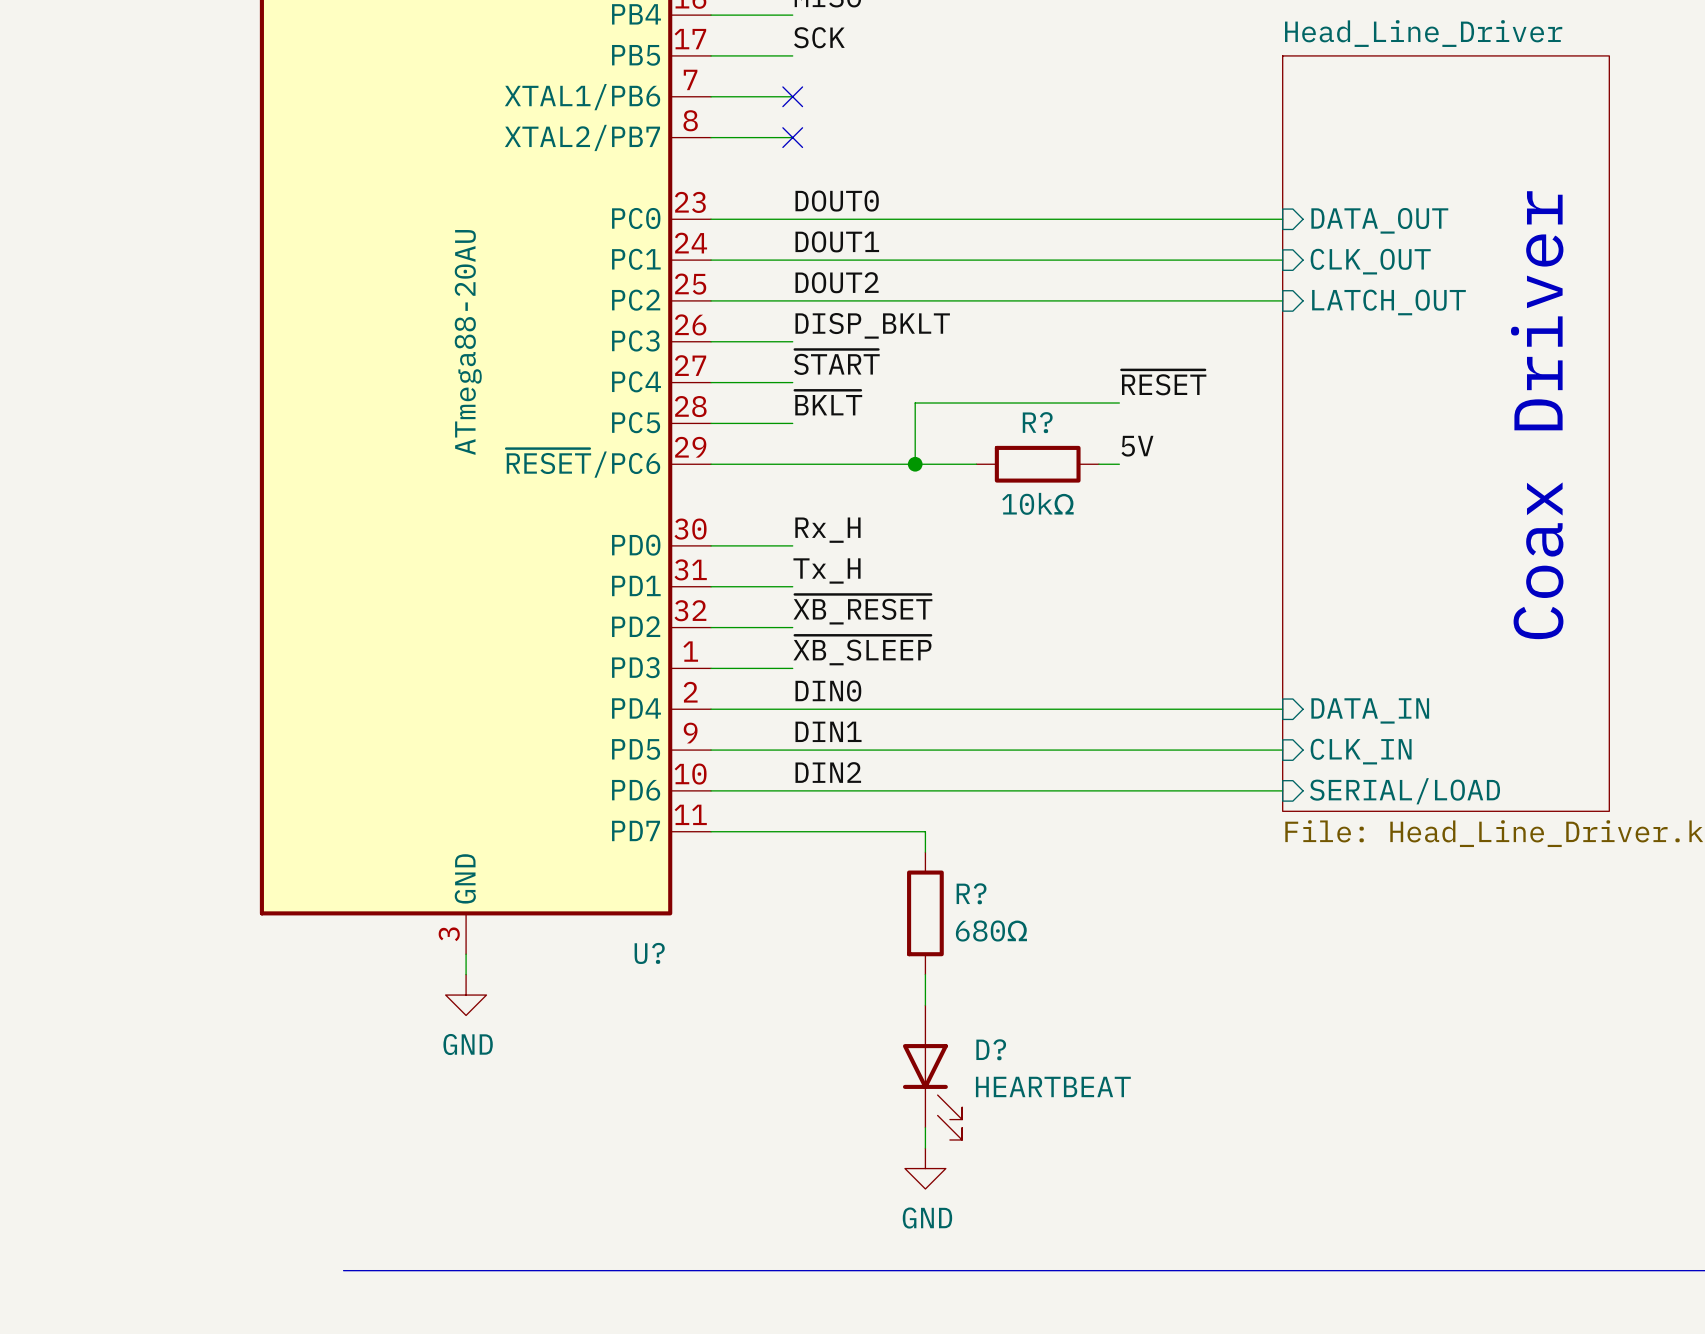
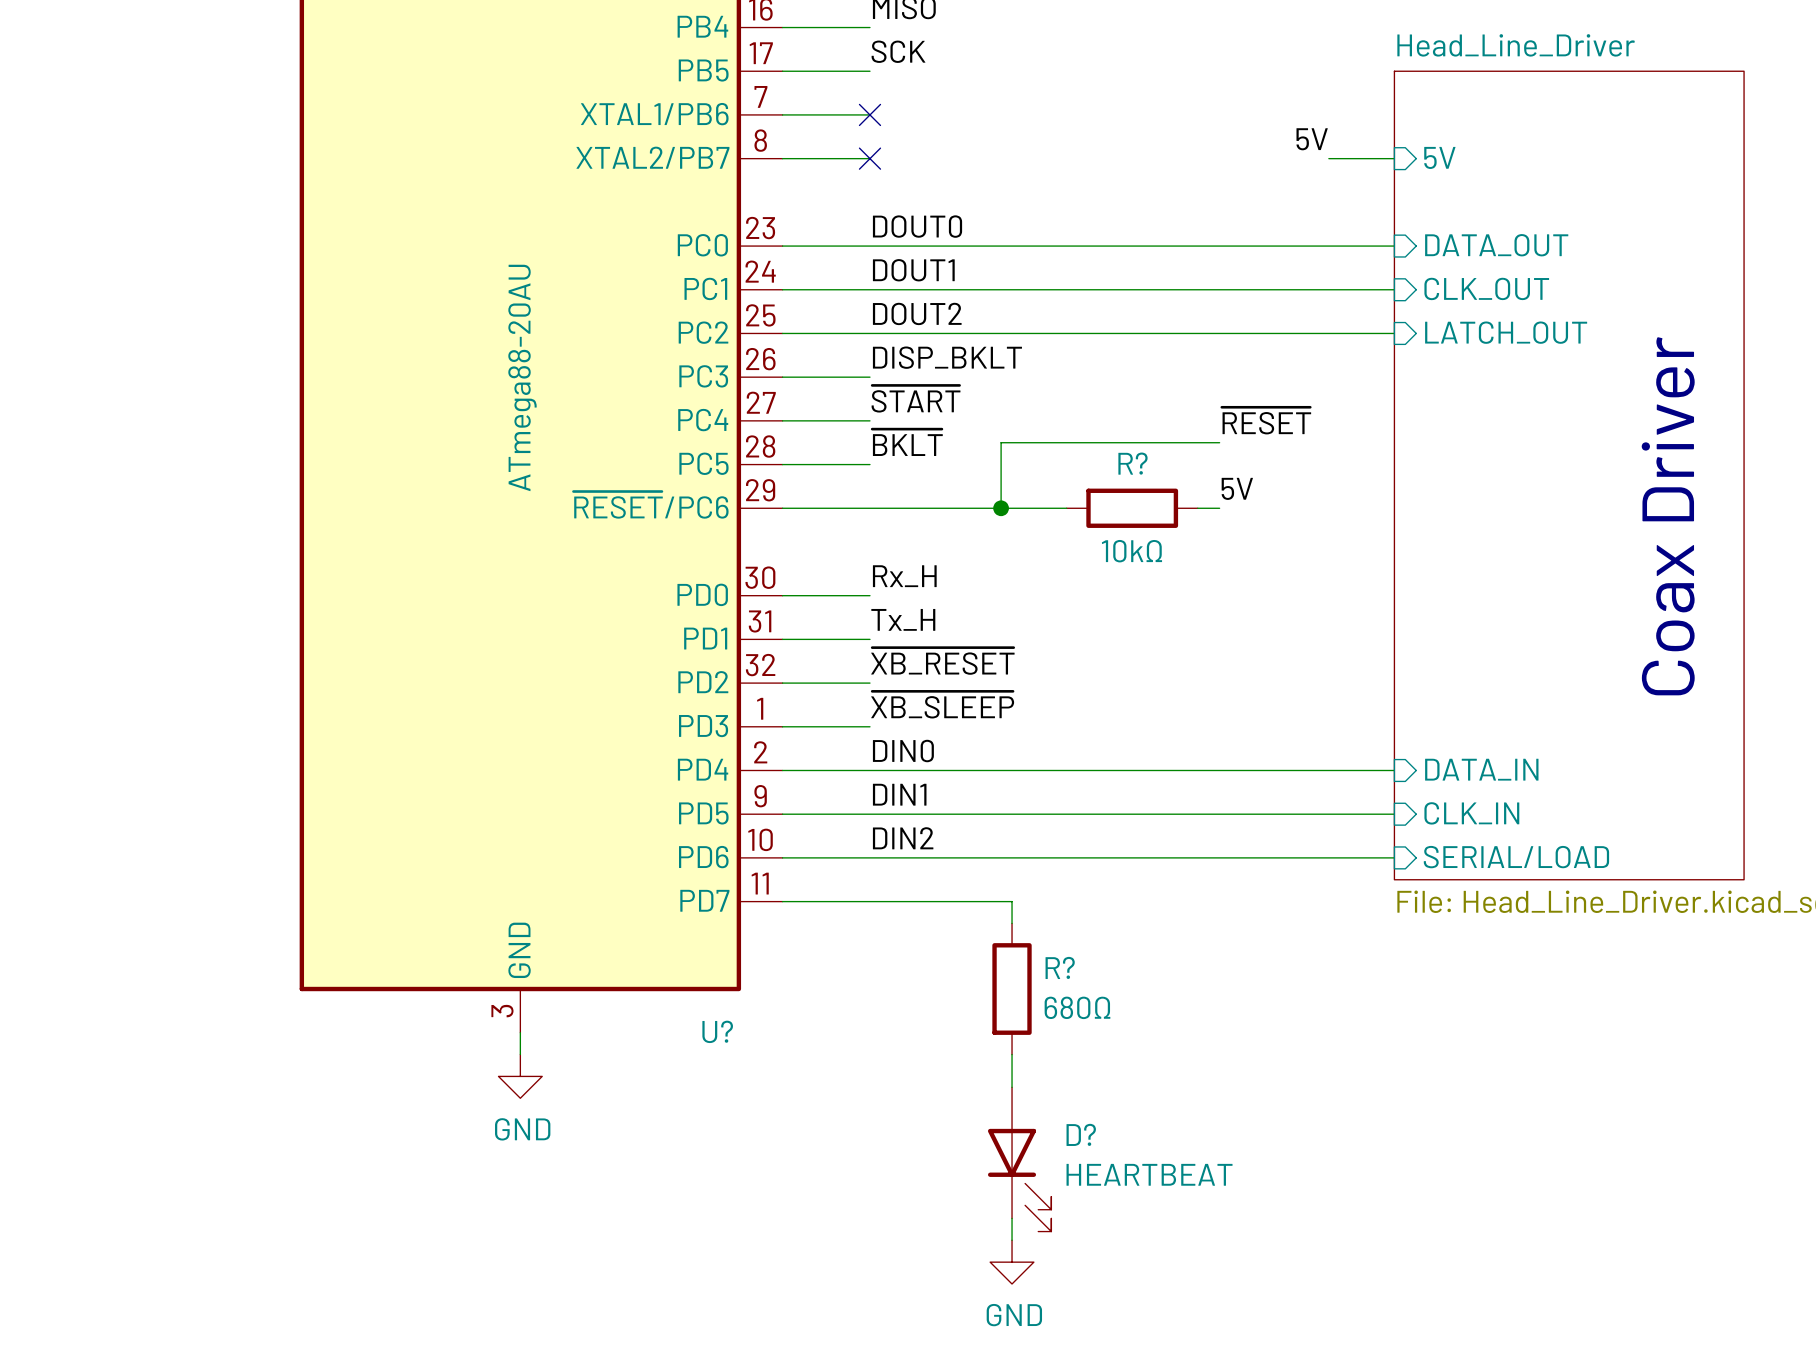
label: none -> 5V (1312, 139)
wire: none -> (1328, 158) (1394, 158)
sheet pin: none -> 5V (1439, 157)

